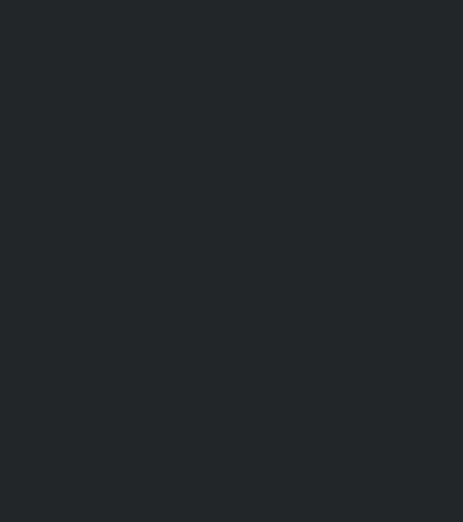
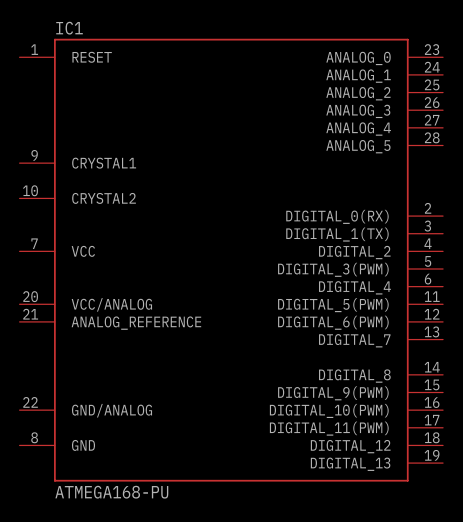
IC1: none -> ATMEGA168-PU (231, 260)

